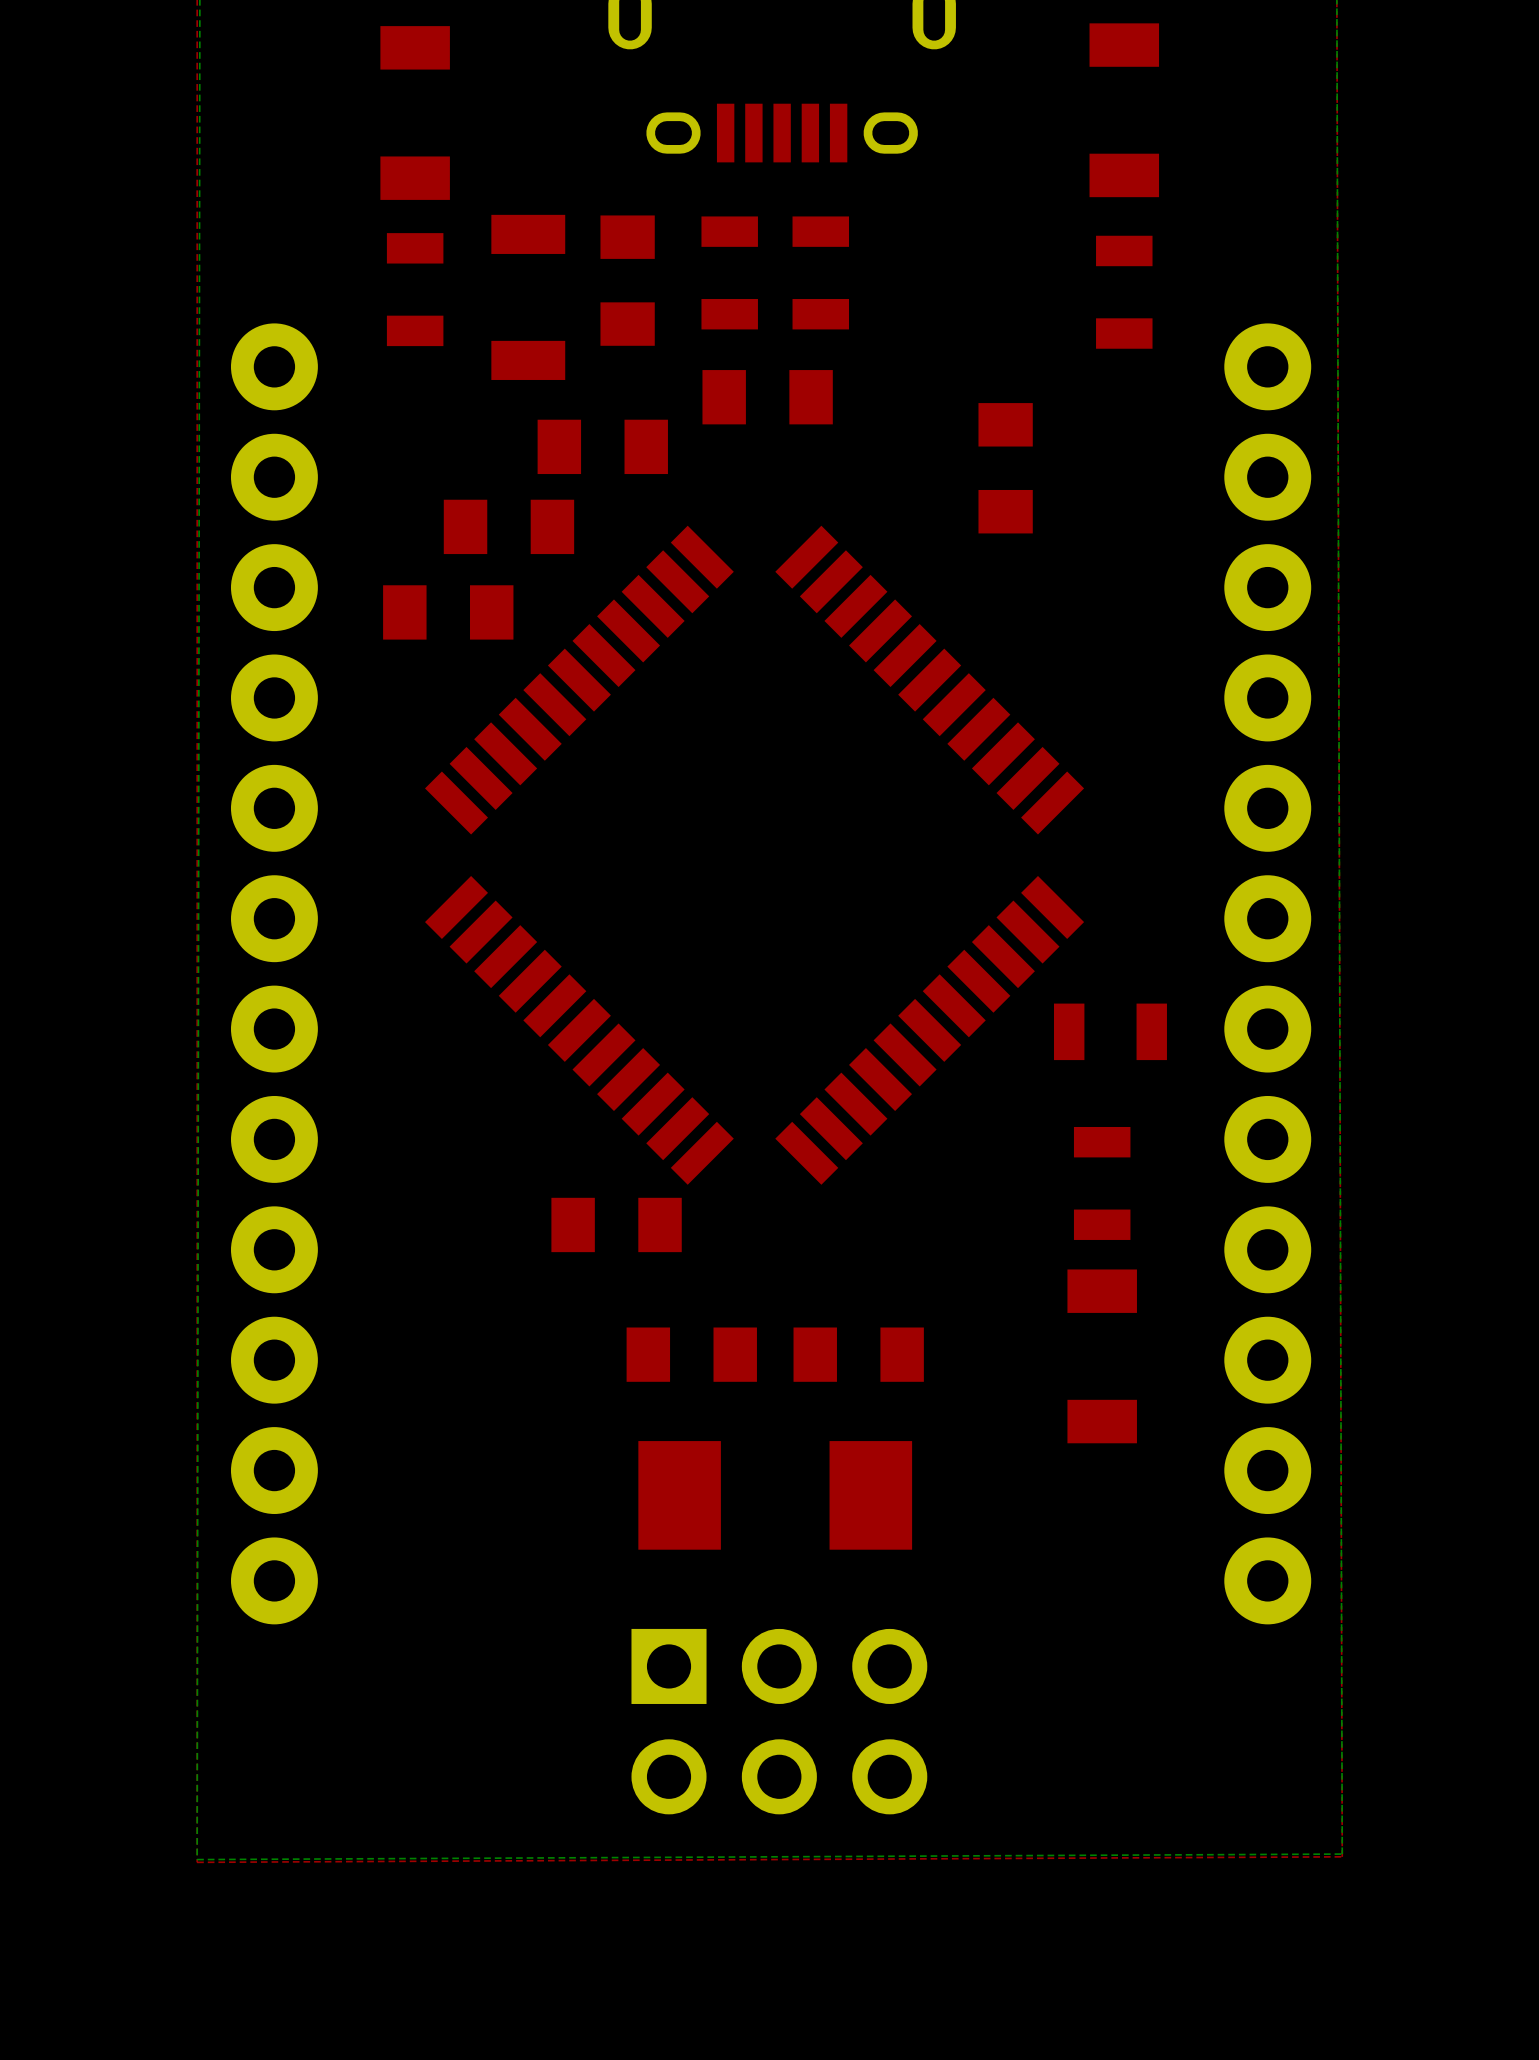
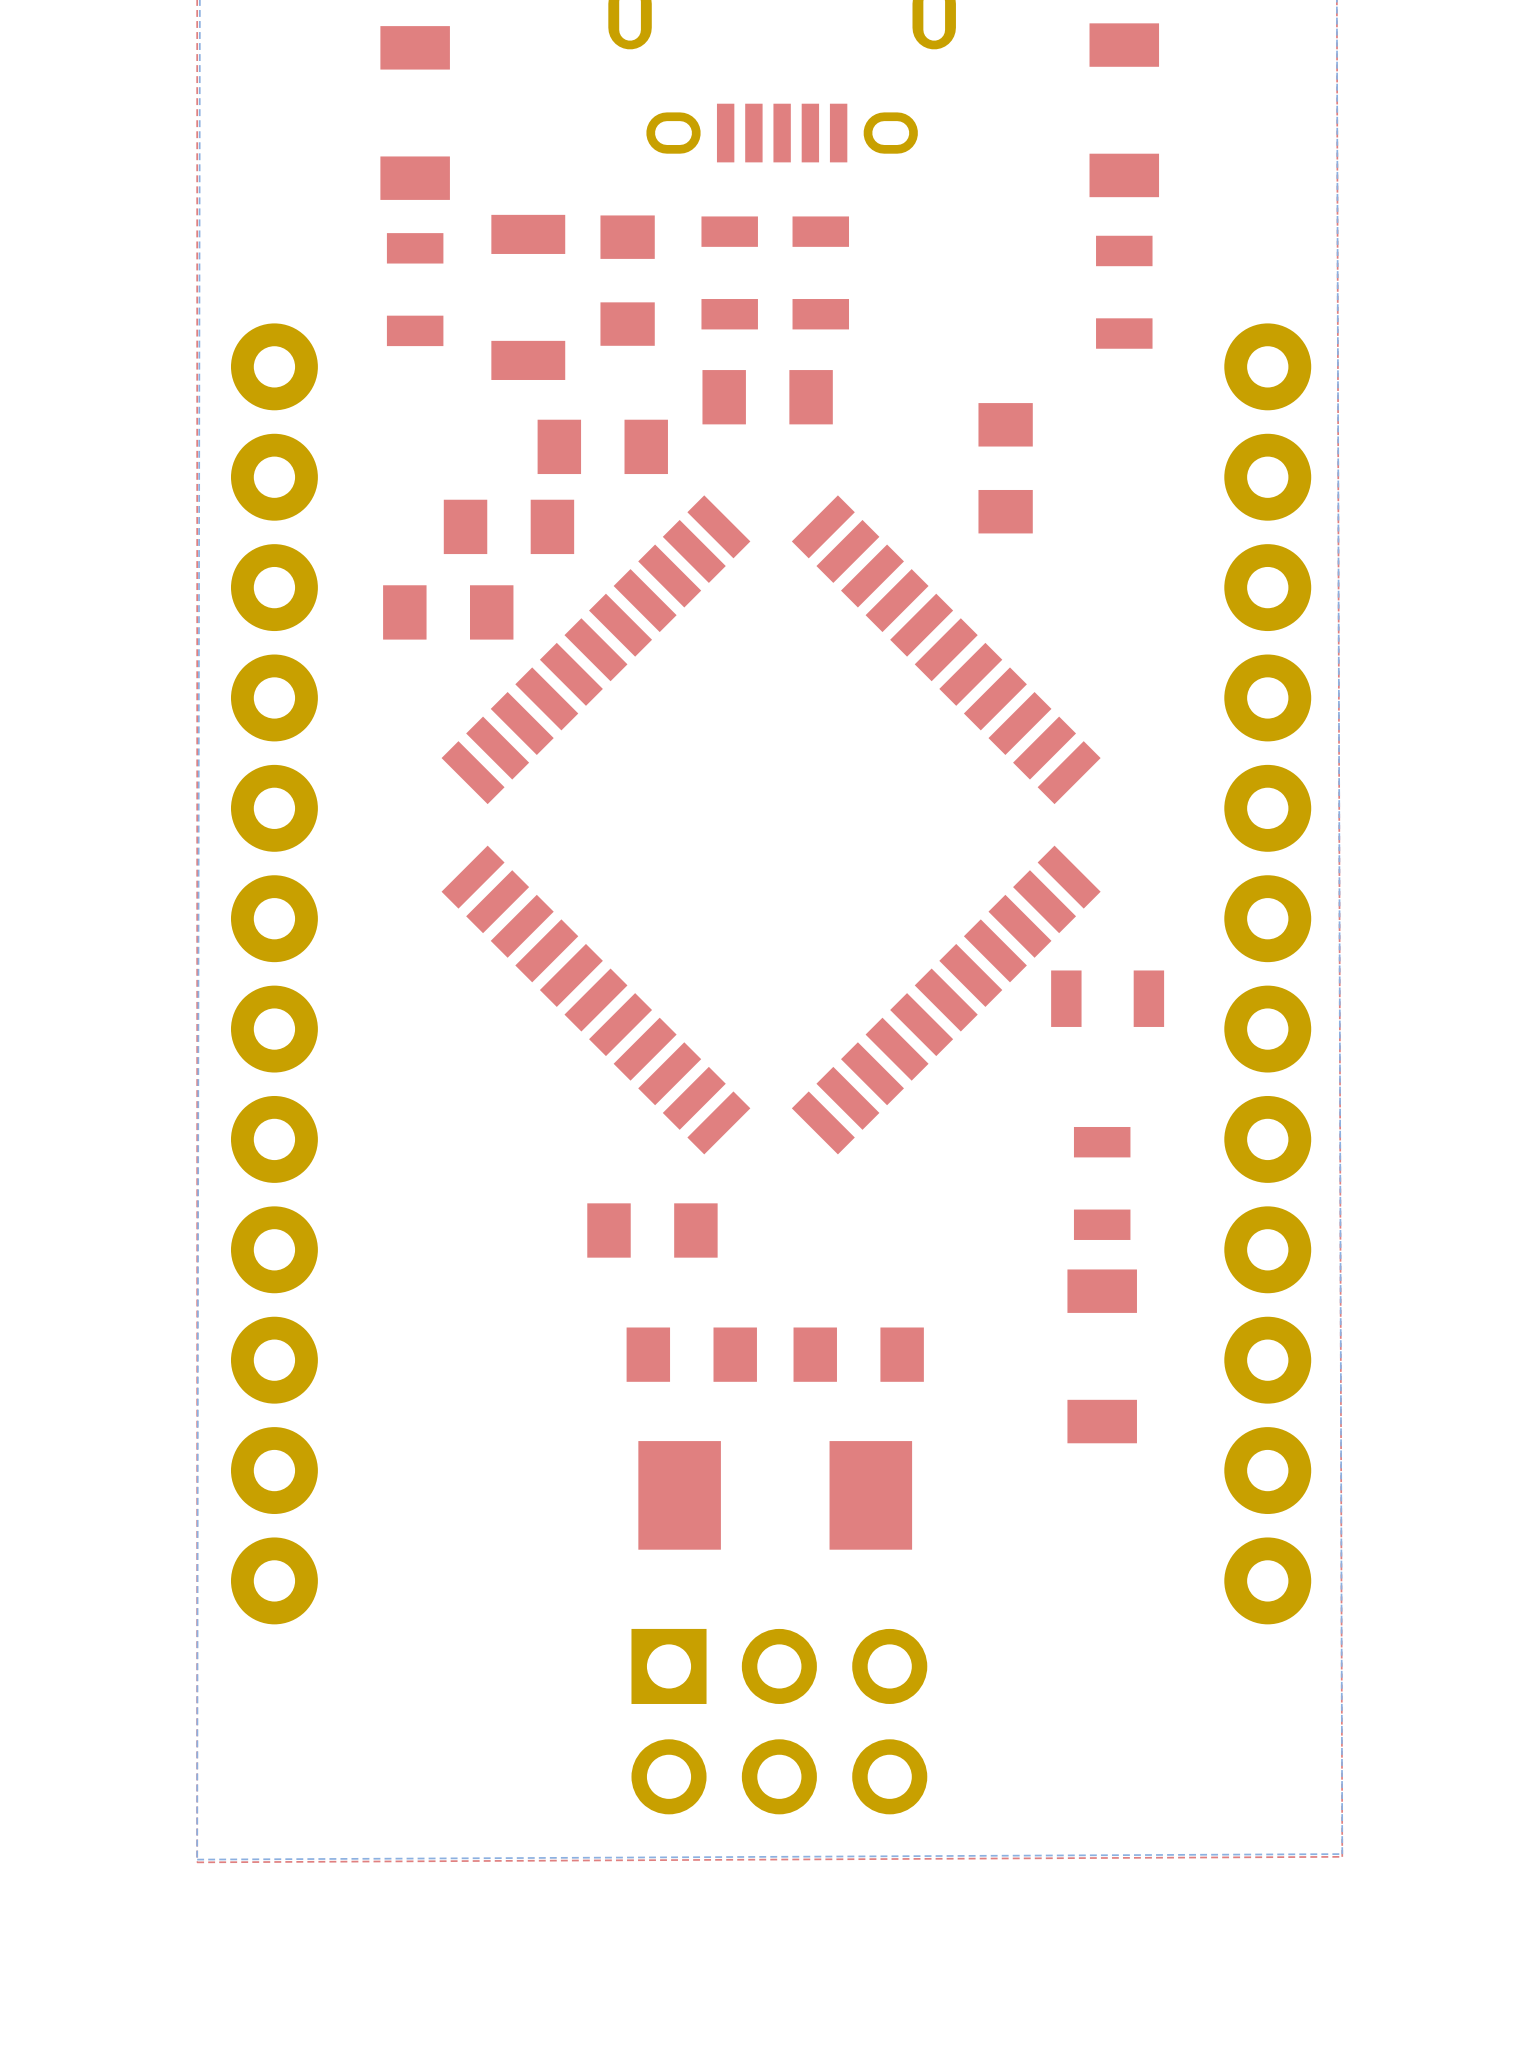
part position: (754, 855) -> (771, 824)
part position: (1110, 1031) -> (1107, 998)
part position: (616, 1224) -> (652, 1230)

